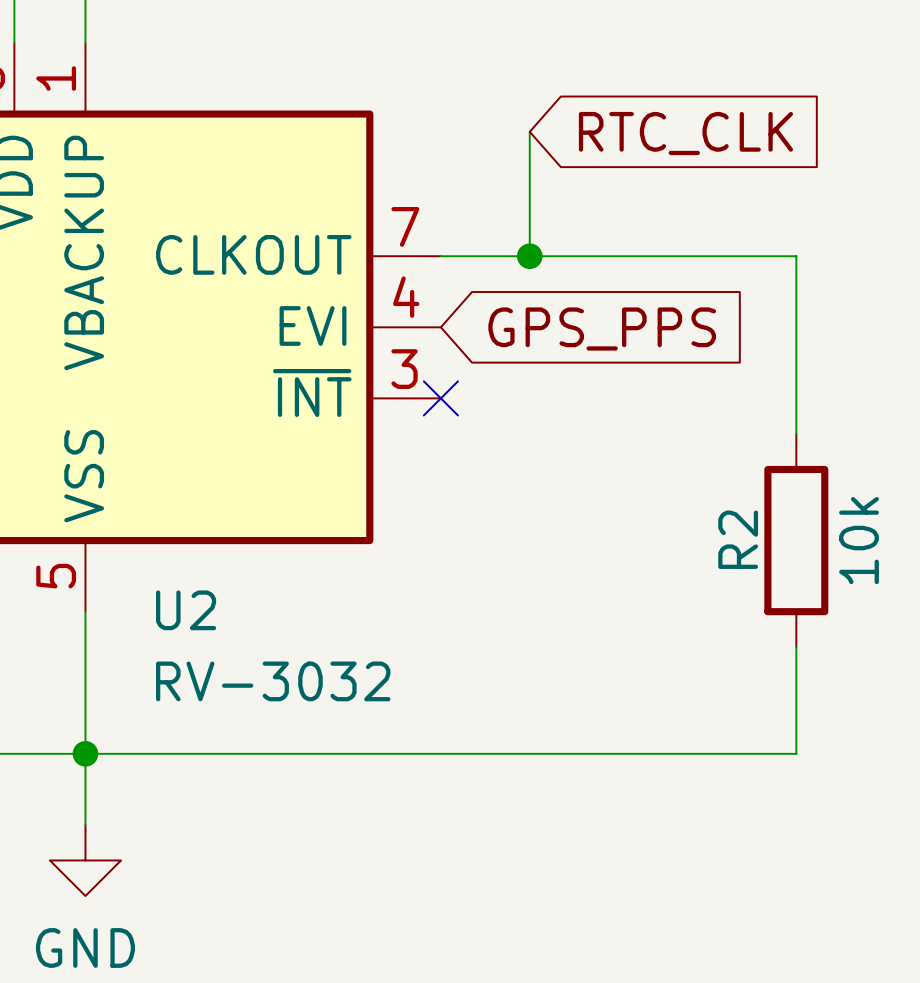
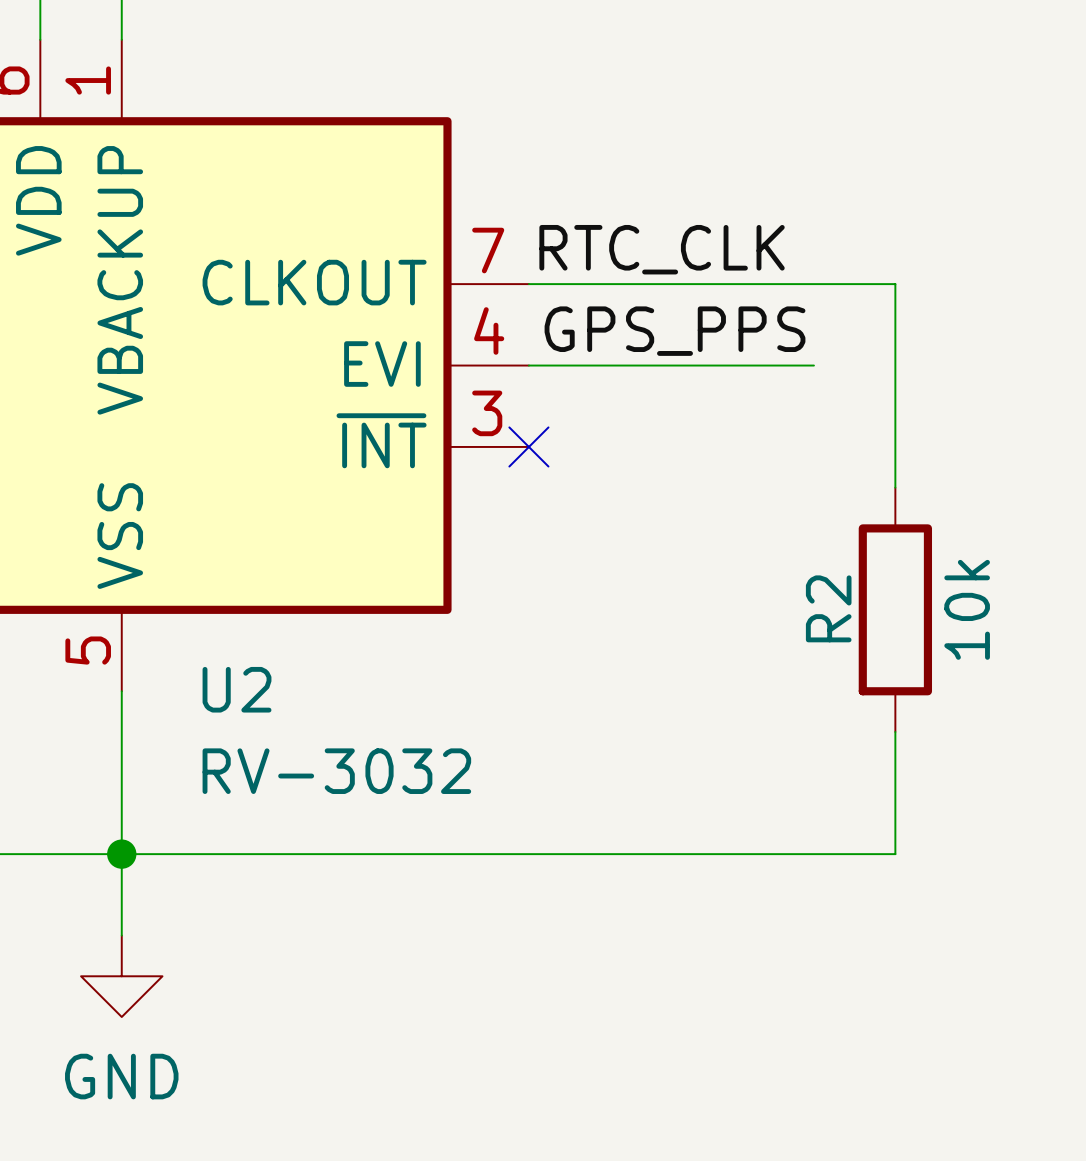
wire: (529, 131) (529, 256) -> none
global label: RTC_CLK (685, 133) -> none
label: none -> RTC_CLK (662, 249)
junction: (529, 256) -> none
wire: (760, 256) (796, 256) (796, 433) -> (895, 284) (895, 487)
label: none -> GPS_PPS (675, 331)
wire: none -> (528, 365) (813, 365)
global label: GPS_PPS (602, 329) -> none
R2 position: (796, 540) -> (895, 609)
wire: (796, 647) (796, 753) (760, 753) -> (895, 731) (895, 854)

